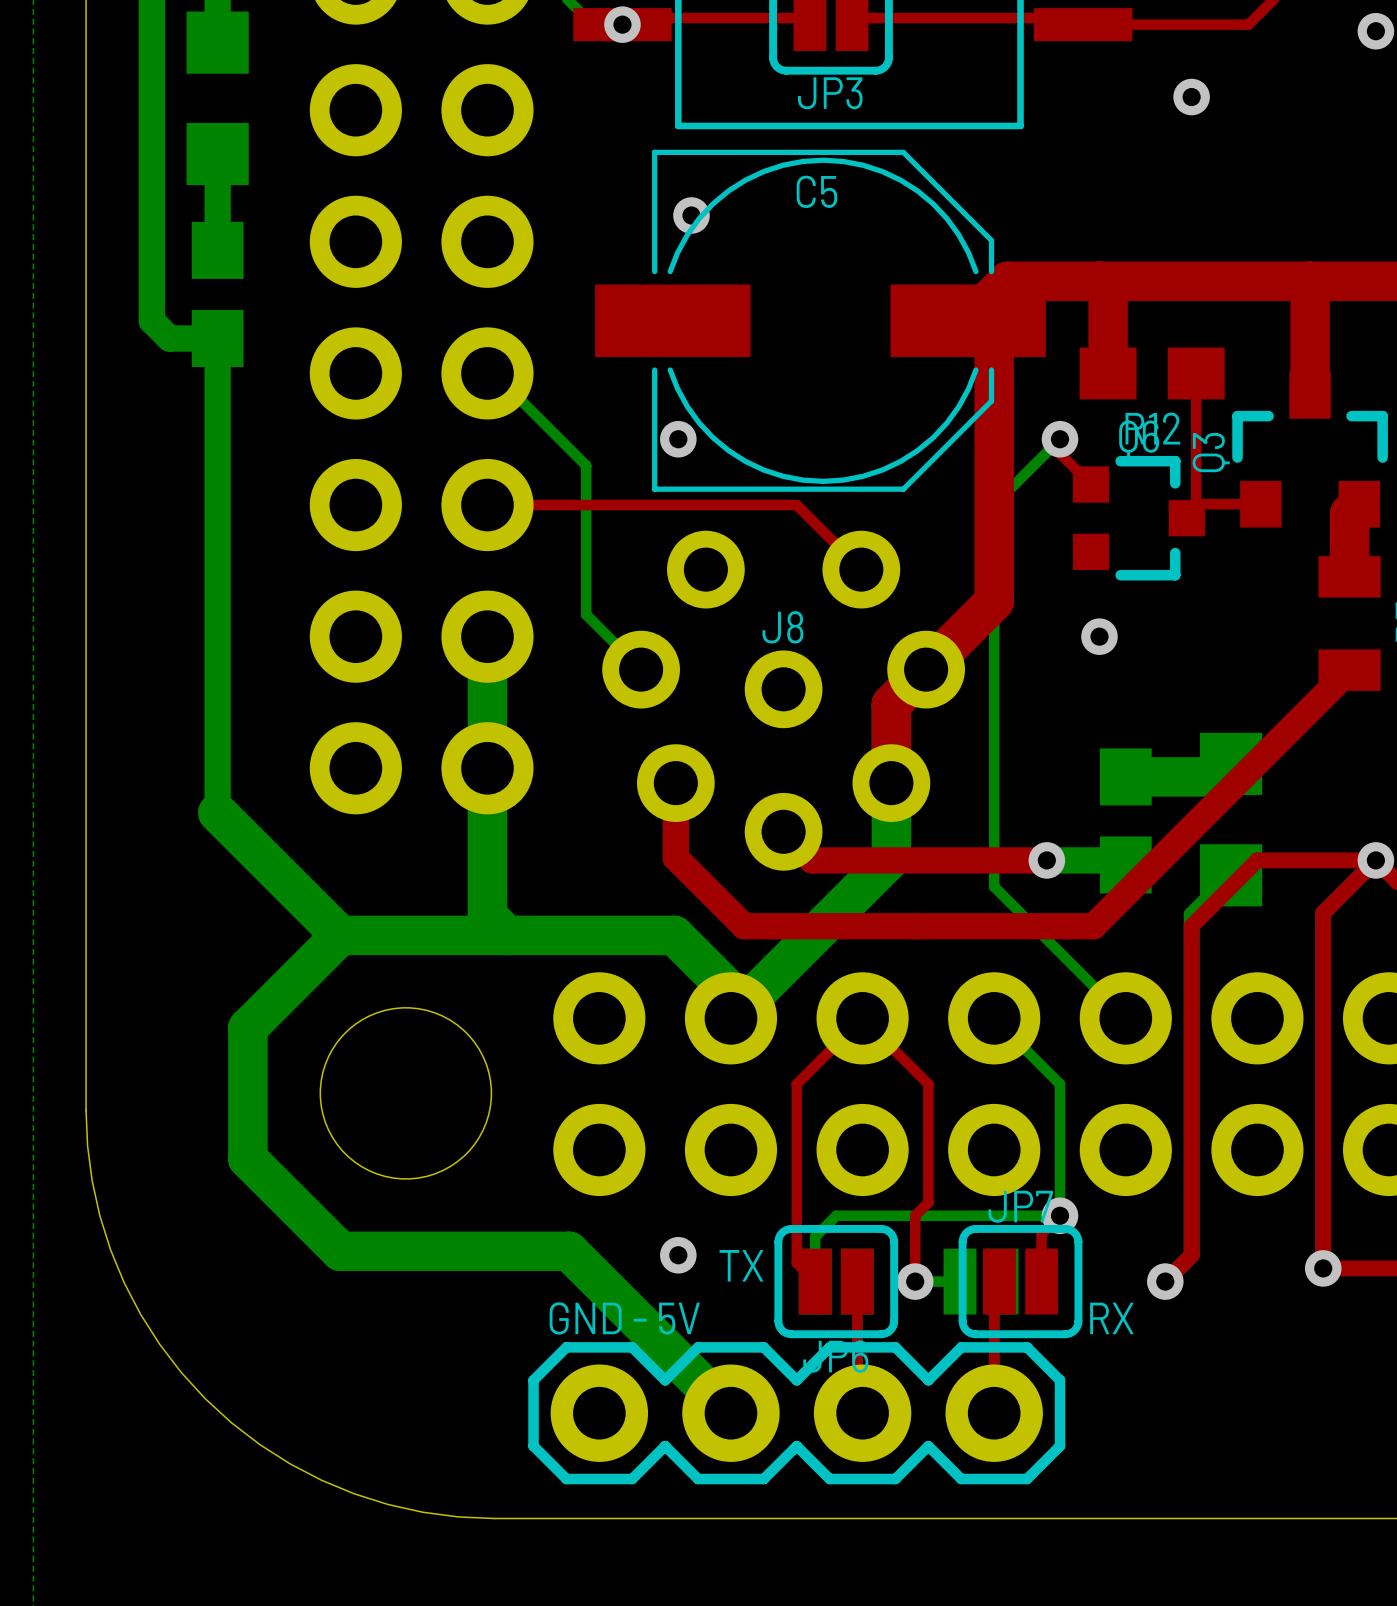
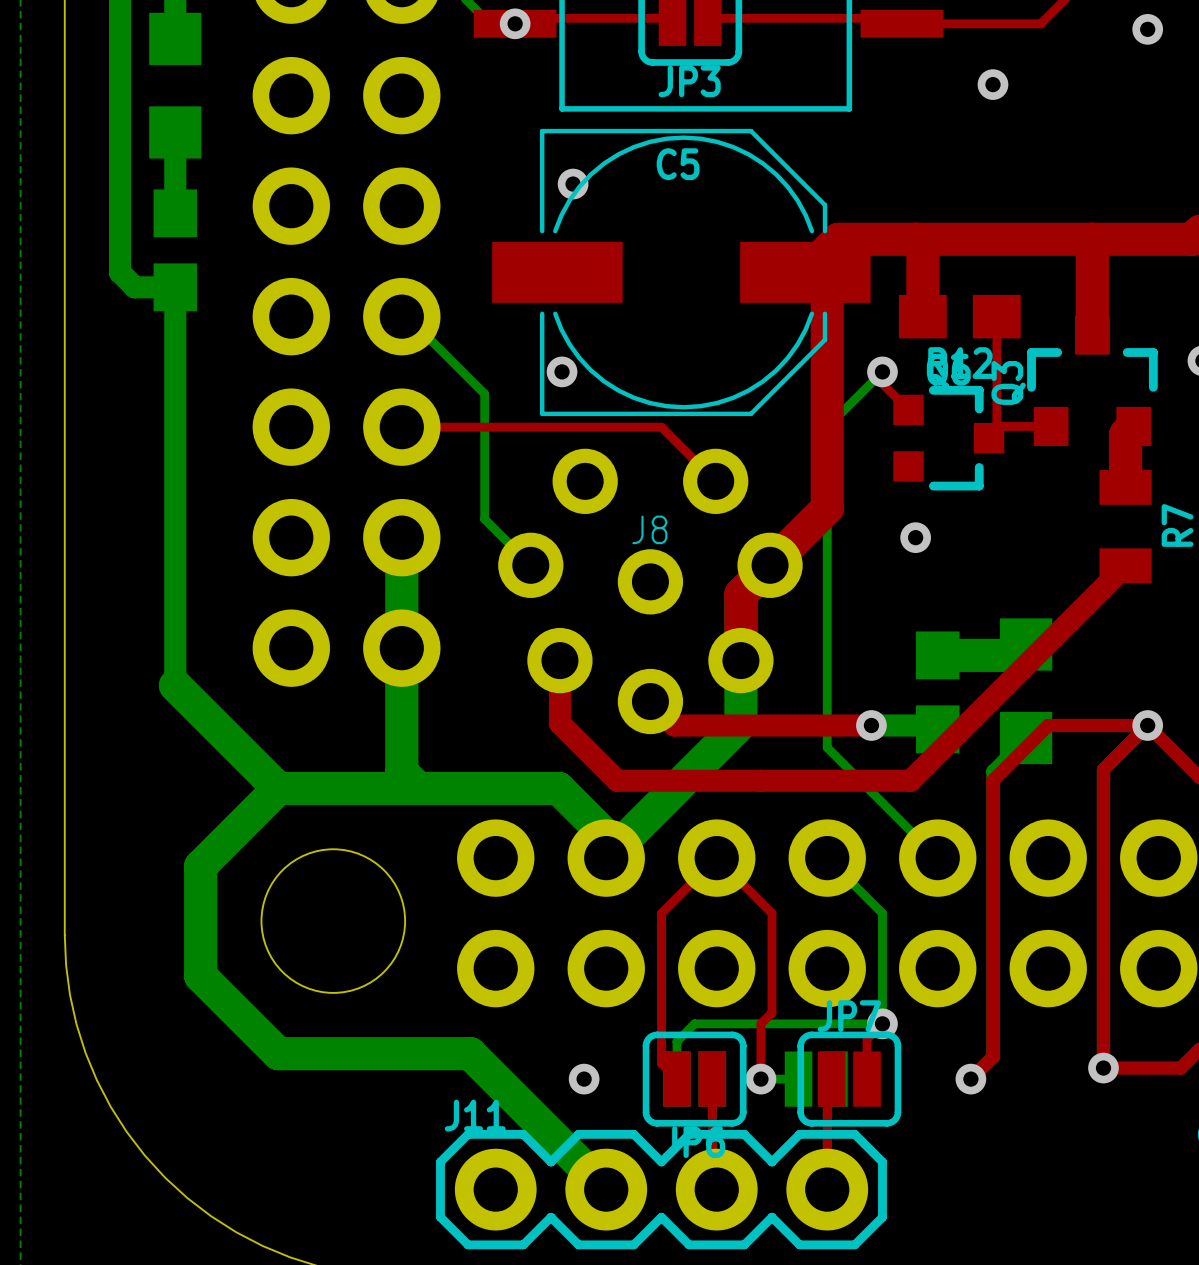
via position: (678, 1255) -> (584, 1079)
text: TX (741, 1265) -> none
text: GND - 5V (624, 1318) -> none
text: RX (1111, 1318) -> none
J11 name: none -> J11 (475, 1115)

